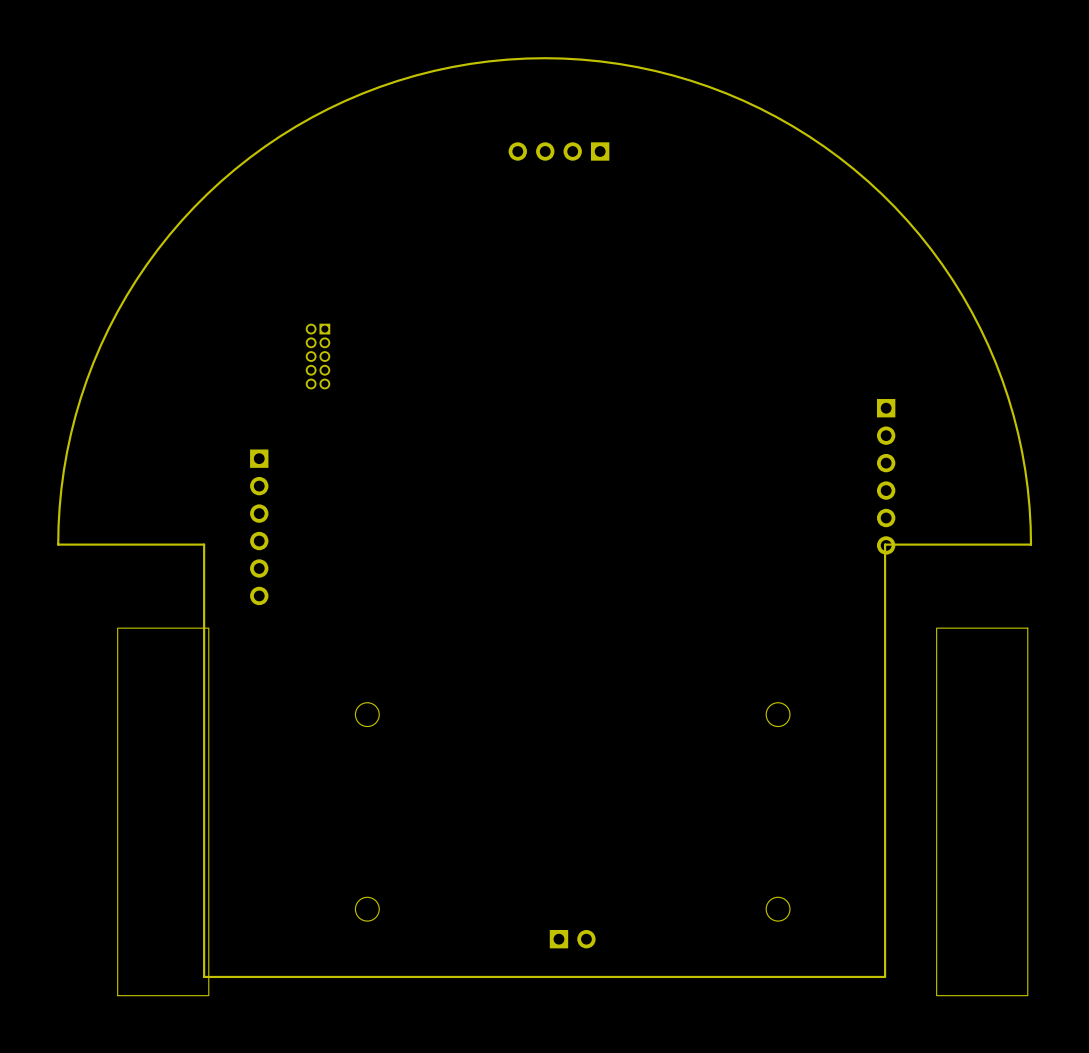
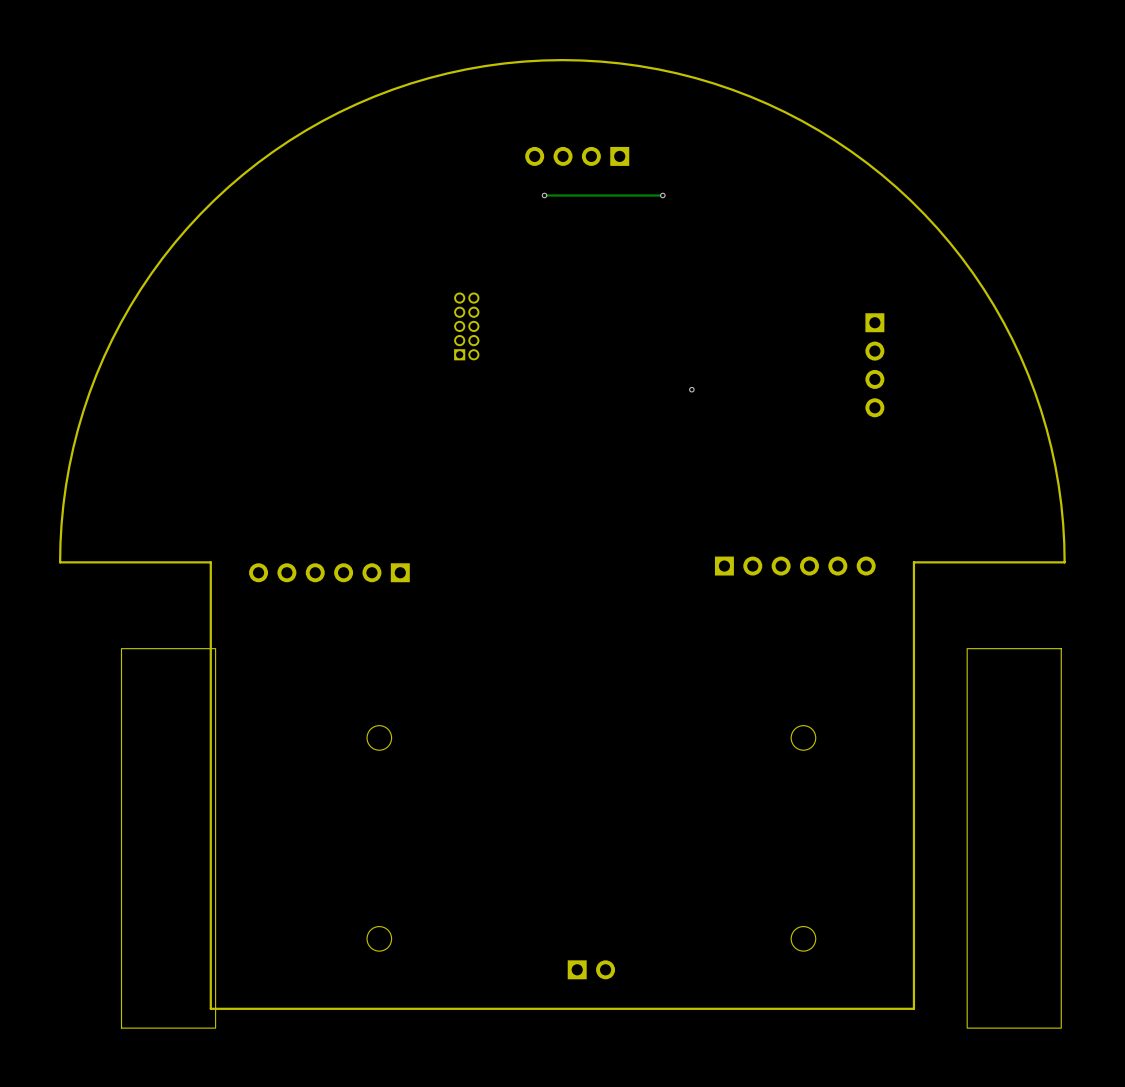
via: none -> (544, 195)
track: none -> (662, 195) (544, 195)
via: none -> (662, 195)
part: none -> (874, 365)
part rotation: 0° (318, 356) -> 180° (466, 326)
part position: (318, 356) -> (466, 326)
via: none -> (691, 389)
part rotation: 0° (886, 476) -> 90° counterclockwise (795, 566)
part position: (886, 476) -> (795, 566)
part rotation: 0° (259, 527) -> 90° clockwise (329, 572)

